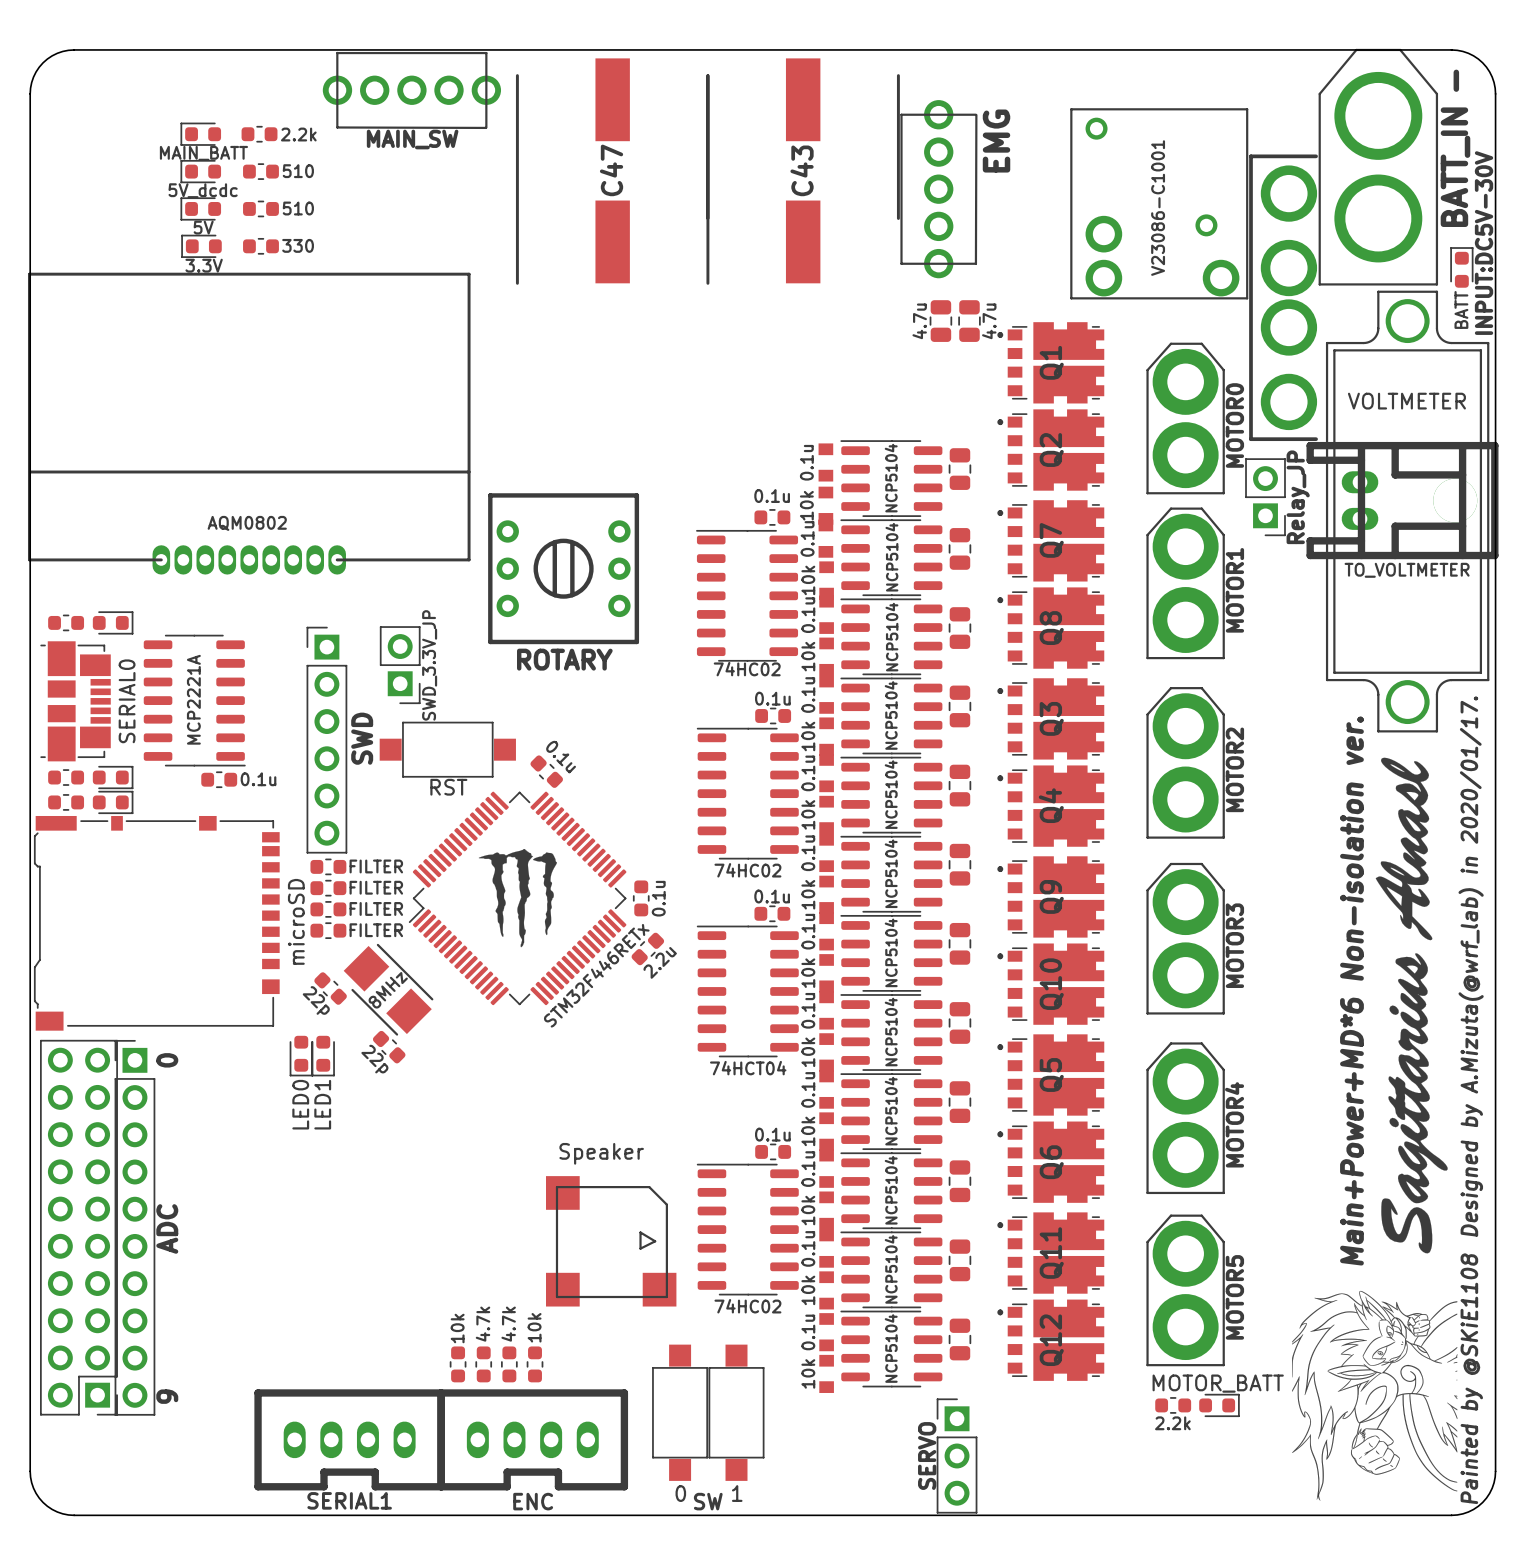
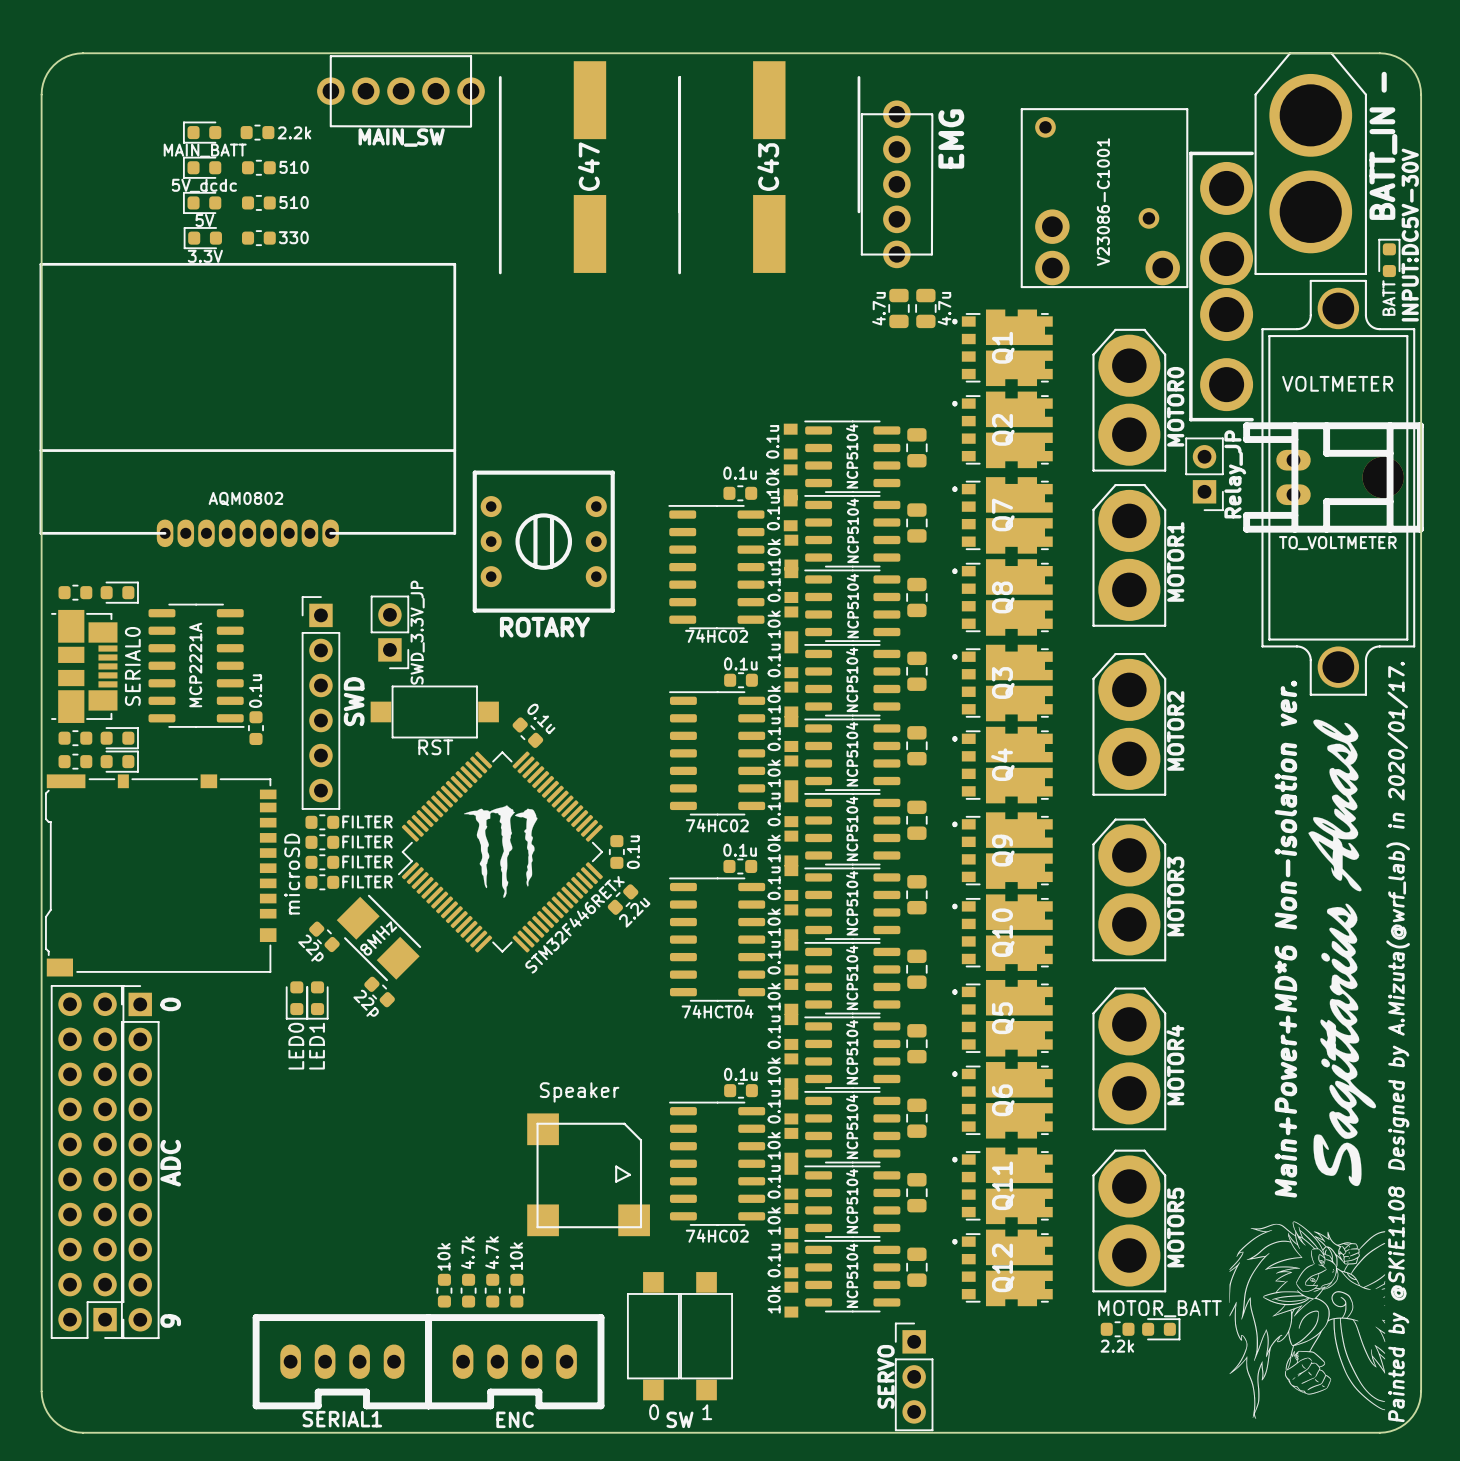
part rotation: 0° (219, 779) -> 90° clockwise (255, 728)
part position: (219, 779) -> (255, 728)
part value position: 0.1u (258, 779) -> 0.1u (255, 691)

